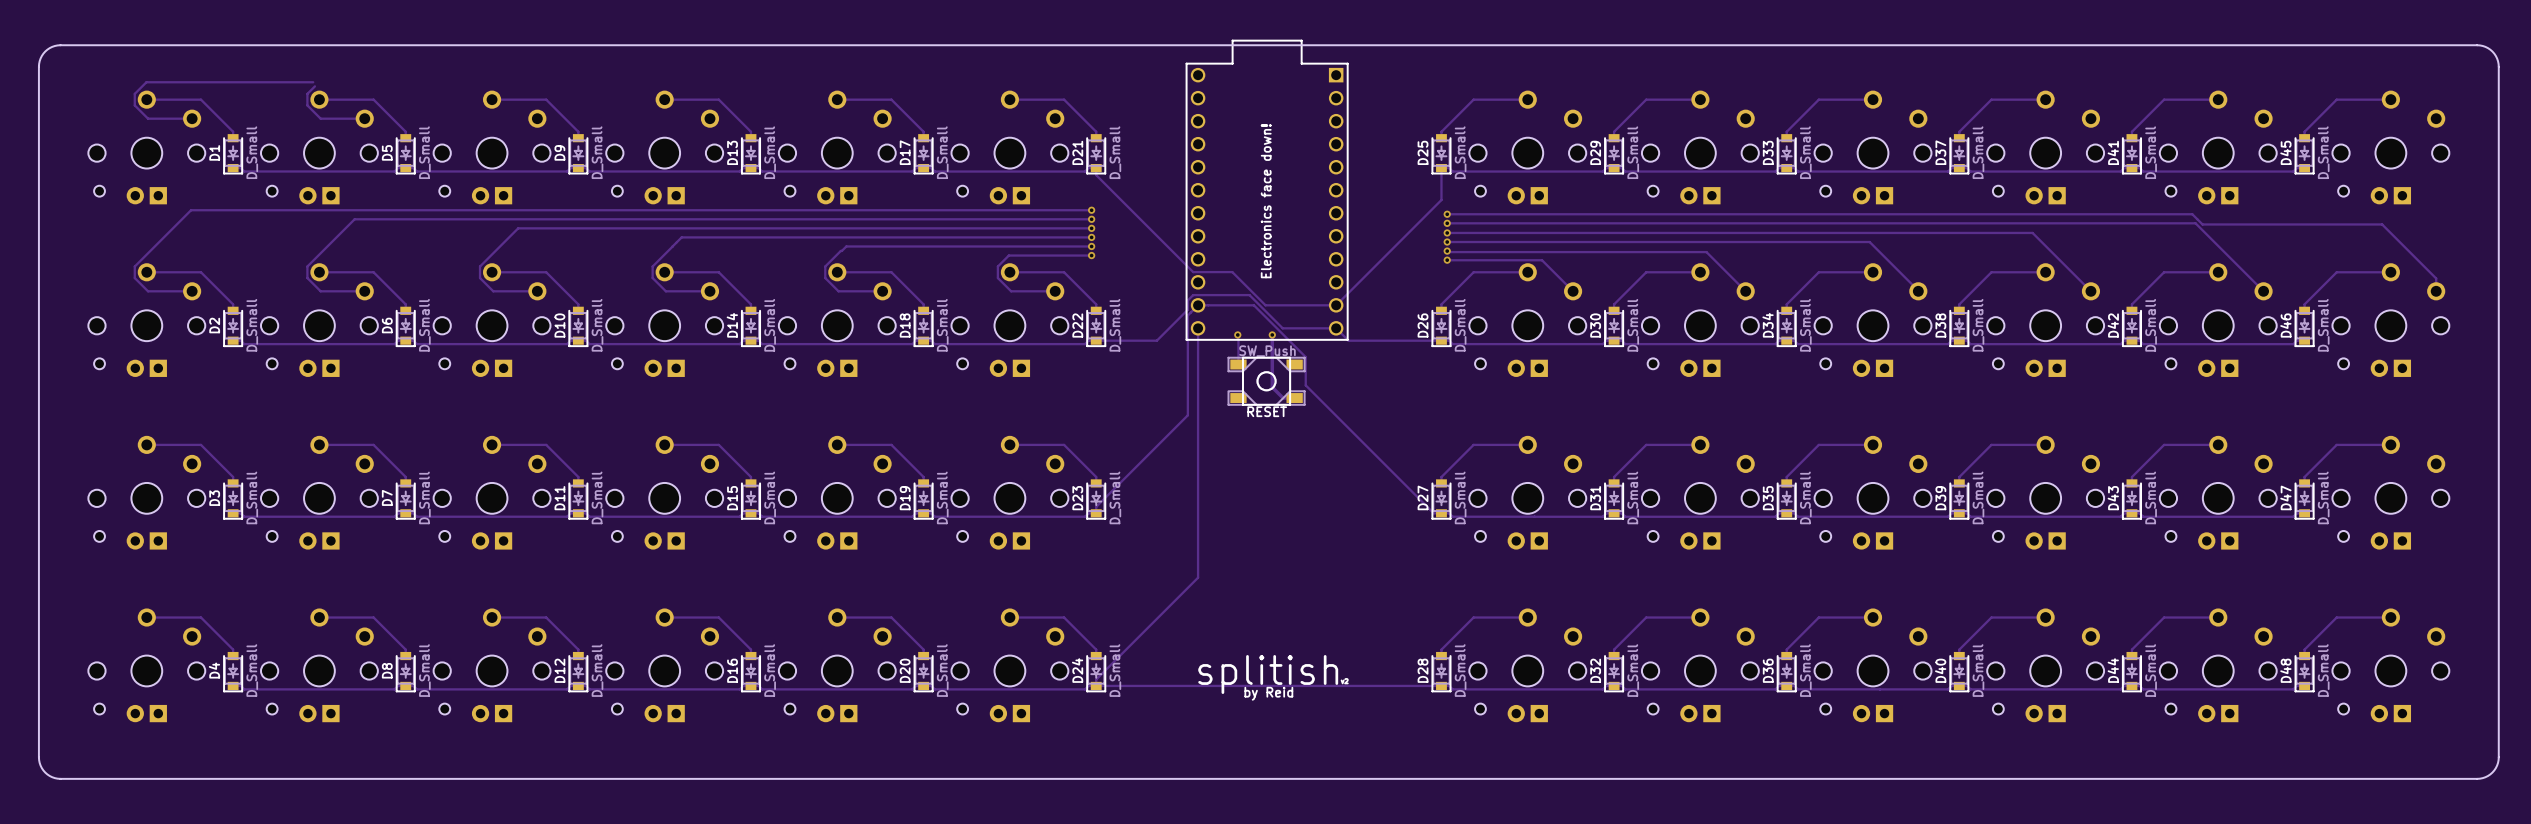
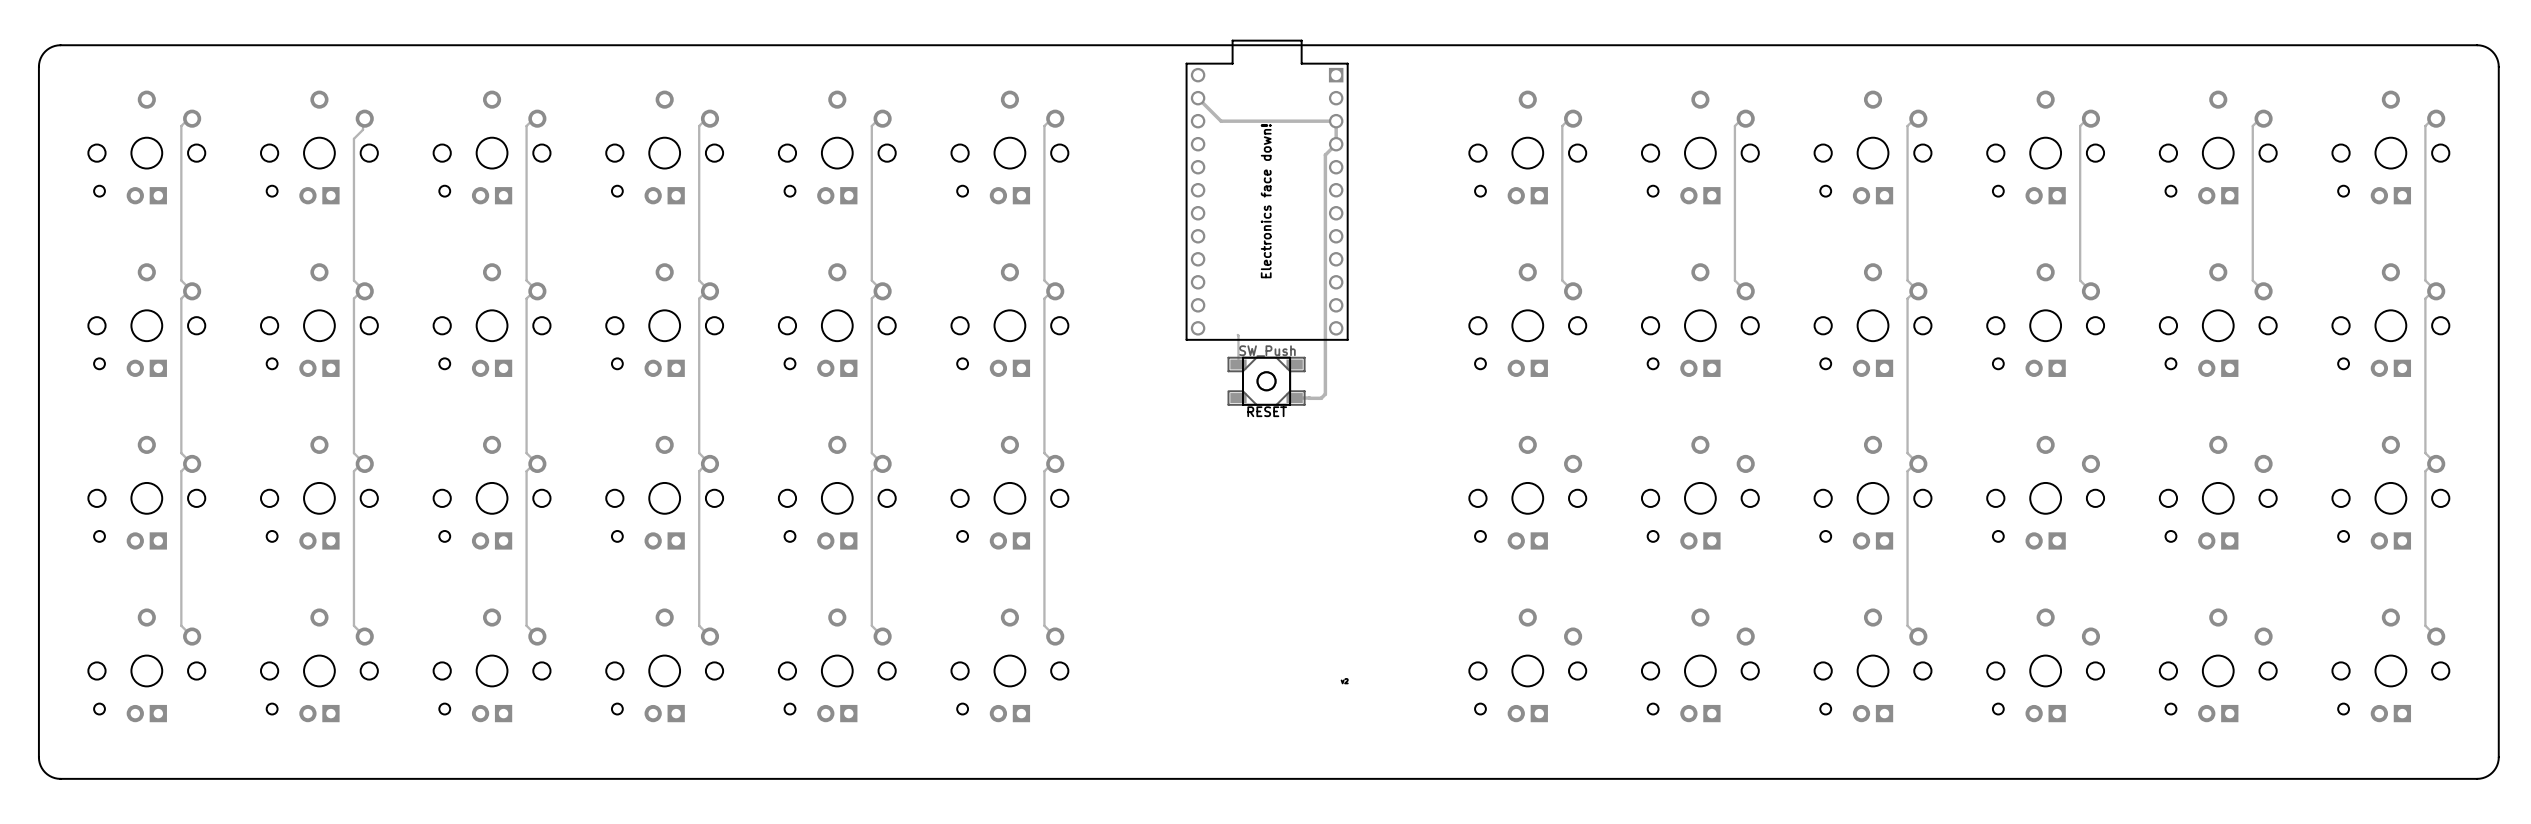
track: (313, 82) (146, 82) (134, 93) (134, 105) (148, 118) (192, 118) -> none
track: (314, 86) (307, 93) (307, 105) (320, 118) (364, 118) -> none
track: (146, 99) (200, 99) (233, 131) (233, 138) -> none
track: (319, 99) (373, 99) (405, 131) (405, 138) -> none
track: (492, 99) (546, 99) (578, 131) (578, 138) -> none
track: (664, 99) (718, 99) (750, 131) (750, 138) -> none
track: (837, 99) (891, 99) (923, 131) (923, 138) -> none
track: (1009, 99) (1064, 99) (1096, 131) (1096, 138) -> none
track: (1527, 99) (1473, 99) (1441, 131) (1441, 138) -> none
track: (1700, 99) (1646, 99) (1614, 131) (1614, 138) -> none
track: (1873, 99) (1818, 99) (1786, 131) (1786, 138) -> none
track: (2045, 99) (1991, 99) (1959, 131) (1959, 138) -> none
track: (2218, 99) (2164, 99) (2131, 131) (2131, 138) -> none
track: (2390, 99) (2336, 99) (2304, 131) (2304, 138) -> none
track: none -> (190, 116) (181, 126) (181, 280) (190, 289) (181, 298) (181, 453) (190, 462) (181, 471) (181, 625) (190, 634)
track: none -> (363, 116) (363, 129) (353, 138) (353, 280) (363, 289) (353, 298) (353, 453) (363, 462) (353, 471) (353, 625) (363, 634)
track: none -> (535, 116) (526, 126) (526, 280) (535, 289) (526, 298) (526, 453) (535, 462) (526, 471) (526, 625) (535, 634)
track: none -> (708, 116) (699, 126) (699, 280) (708, 289) (699, 298) (699, 453) (708, 462) (699, 471) (699, 625) (708, 634)
track: none -> (880, 116) (871, 126) (871, 280) (880, 289) (871, 298) (871, 453) (880, 462) (871, 471) (871, 625) (880, 634)
track: none -> (1053, 116) (1044, 126) (1044, 280) (1053, 289) (1044, 298) (1044, 453) (1053, 462) (1044, 471) (1044, 625) (1053, 634)
track: none -> (1916, 116) (1907, 126) (1907, 280) (1916, 289) (1907, 298) (1907, 453) (1916, 462) (1907, 471) (1907, 625) (1916, 634)
track: none -> (2434, 116) (2425, 126) (2425, 280) (2434, 289) (2425, 298) (2425, 453) (2434, 462) (2425, 471) (2425, 625) (2434, 634)
D1: D_Small (233, 154) -> none
D5: D_Small (405, 154) -> none
D9: D_Small (578, 154) -> none
D13: D_Small (750, 154) -> none
D17: D_Small (923, 154) -> none
D21: D_Small (1096, 154) -> none
D25: D_Small (1441, 154) -> none
D29: D_Small (1614, 154) -> none
D33: D_Small (1786, 154) -> none
D37: D_Small (1959, 154) -> none
D41: D_Small (2131, 154) -> none
D45: D_Small (2304, 154) -> none
track: (233, 168) (240, 168) (244, 171) (394, 171) (398, 168) (413, 168) (416, 171) (567, 171) (570, 168) (586, 168) (589, 171) (739, 171) (743, 168) (758, 168) (762, 171) (912, 171) (915, 168) (931, 168) (934, 171) (1085, 171) (1088, 168) (1096, 168) (1096, 175) (1193, 272) (1232, 272) (1265, 305) (1336, 305) (1441, 200) (1441, 168) (1449, 168) (1452, 171) (1602, 171) (1606, 168) (1621, 168) (1625, 171) (1775, 171) (1778, 168) (1794, 168) (1797, 171) (1948, 171) (1951, 168) (1967, 168) (1970, 171) (2120, 171) (2124, 168) (2139, 168) (2143, 171) (2293, 171) (2296, 168) (2304, 168) -> none
track: (1091, 210) (191, 210) (134, 266) (134, 278) (148, 291) (192, 291) -> none
via: (1091, 210) -> none
track: (1447, 214) (2192, 214) (2202, 224) (2382, 224) (2436, 278) (2436, 291) -> none
via: (1447, 214) -> none
track: (1091, 219) (354, 219) (307, 266) (307, 278) (320, 291) (364, 291) -> none
via: (1091, 219) -> none
track: (1447, 223) (2195, 223) (2252, 280) -> (2261, 116) (2252, 126) (2252, 280)
via: (1447, 223) -> none
track: (1091, 228) (518, 228) (480, 266) (480, 278) (493, 291) (537, 291) -> none
via: (1091, 228) -> none
track: (1447, 232) (2032, 232) (2080, 280) -> (2089, 116) (2080, 126) (2080, 280)
via: (1447, 232) -> none
track: (1091, 237) (681, 237) (672, 246) -> none
via: (1091, 237) -> none
track: (1447, 242) (1869, 242) (1918, 291) -> none
via: (1447, 242) -> none
track: (672, 246) (652, 266) (652, 278) (665, 291) (709, 291) -> none
track: (1091, 246) (846, 246) (825, 266) (825, 278) (838, 291) (882, 291) -> none
via: (1091, 246) -> none
track: (1447, 251) (1706, 252) (1734, 280) -> (1743, 116) (1734, 126) (1734, 280)
via: (1447, 251) -> none
track: (1091, 255) (1008, 255) (997, 266) (997, 278) (1011, 291) (1055, 291) -> none
via: (1091, 255) -> none
track: (1447, 260) (1542, 260) (1562, 280) -> (1571, 116) (1562, 126) (1562, 280)
via: (1447, 260) -> none
track: (146, 272) (200, 272) (233, 304) (233, 310) -> none
track: (319, 272) (373, 272) (405, 304) (405, 310) -> none
track: (492, 272) (546, 272) (578, 304) (578, 310) -> none
track: (664, 272) (718, 272) (750, 304) (750, 310) -> none
track: (837, 272) (891, 272) (923, 304) (923, 310) -> none
track: (1009, 272) (1064, 272) (1096, 304) (1096, 310) -> none
track: (1527, 272) (1473, 272) (1441, 304) (1441, 310) -> none
track: (1700, 272) (1646, 272) (1614, 304) (1614, 310) -> none
track: (1873, 272) (1818, 272) (1786, 304) (1786, 310) -> none
track: (2045, 272) (1991, 272) (1959, 304) (1959, 310) -> none
track: (2218, 272) (2164, 272) (2131, 304) (2131, 310) -> none
track: (2390, 272) (2336, 272) (2304, 304) (2304, 310) -> none
D2: D_Small (233, 326) -> none
D6: D_Small (405, 326) -> none
D10: D_Small (578, 326) -> none
D14: D_Small (750, 326) -> none
D18: D_Small (923, 326) -> none
D22: D_Small (1096, 326) -> none
D26: D_Small (1441, 326) -> none
D30: D_Small (1614, 326) -> none
D34: D_Small (1786, 326) -> none
D38: D_Small (1959, 326) -> none
D42: D_Small (2131, 326) -> none
D46: D_Small (2304, 326) -> none
track: (1198, 328) (1198, 577) (1096, 679) (1096, 685) -> none
via: (1237, 334) -> none
track: (1272, 334) (1272, 387) (1283, 398) (1294, 398) -> (1198, 98) (1221, 121) (1336, 121) (1336, 144) (1325, 154) (1325, 394) (1321, 398) (1294, 398)
via: (1272, 334) -> none
track: (233, 340) (240, 340) (244, 344) (394, 344) (398, 340) (413, 340) (416, 344) (567, 344) (570, 340) (586, 340) (589, 344) (739, 344) (743, 340) (758, 340) (762, 344) (912, 344) (915, 340) (931, 340) (934, 344) (1085, 344) (1088, 340) (1156, 340) (1187, 309) (1187, 300) (1193, 295) (1249, 295) (1282, 328) (1336, 328) (1348, 340) (1449, 340) (1452, 344) (1602, 344) (1606, 340) (1621, 340) (1625, 344) (1775, 344) (1778, 340) (1794, 340) (1797, 344) (1948, 344) (1951, 340) (1967, 340) (1970, 344) (2120, 344) (2124, 340) (2139, 340) (2143, 344) (2293, 344) (2296, 340) (2304, 340) -> none
track: (146, 444) (200, 444) (233, 477) (233, 483) -> none
track: (319, 444) (373, 444) (405, 477) (405, 483) -> none
track: (492, 444) (546, 444) (578, 477) (578, 483) -> none
track: (664, 444) (718, 444) (750, 477) (750, 483) -> none
track: (837, 444) (891, 444) (923, 477) (923, 483) -> none
track: (1009, 444) (1064, 444) (1096, 477) (1096, 483) -> none
track: (1527, 444) (1473, 444) (1441, 477) (1441, 483) -> none
track: (1700, 444) (1646, 444) (1614, 477) (1614, 483) -> none
track: (1873, 444) (1818, 444) (1786, 477) (1786, 483) -> none
track: (2045, 444) (1991, 444) (1959, 477) (1959, 483) -> none
track: (2218, 444) (2164, 444) (2131, 477) (2131, 483) -> none
track: (2390, 444) (2336, 444) (2304, 477) (2304, 483) -> none
D3: D_Small (233, 499) -> none
D7: D_Small (405, 499) -> none
D11: D_Small (578, 499) -> none
D15: D_Small (750, 499) -> none
D19: D_Small (923, 499) -> none
D23: D_Small (1096, 499) -> none
D27: D_Small (1441, 499) -> none
D31: D_Small (1614, 499) -> none
D35: D_Small (1786, 499) -> none
D39: D_Small (1959, 499) -> none
D43: D_Small (2131, 499) -> none
D47: D_Small (2304, 499) -> none
track: (233, 513) (240, 513) (244, 516) (394, 516) (398, 513) (413, 513) (416, 516) (567, 516) (570, 513) (586, 513) (589, 516) (739, 516) (743, 513) (758, 513) (762, 516) (912, 516) (915, 513) (931, 513) (934, 516) (1085, 516) (1088, 513) (1096, 513) (1096, 506) (1187, 415) (1187, 315) (1198, 305) (1253, 305) (1305, 357) (1305, 385) (1433, 513) (1449, 513) (1452, 516) (1602, 516) (1606, 513) (1621, 513) (1625, 516) (1775, 516) (1778, 513) (1794, 513) (1797, 516) (1948, 516) (1951, 513) (1967, 513) (1970, 516) (2120, 516) (2124, 513) (2139, 513) (2143, 516) (2293, 516) (2296, 513) (2304, 513) -> none
track: (146, 617) (200, 617) (233, 649) (233, 656) -> none
track: (319, 617) (373, 617) (405, 649) (405, 656) -> none
track: (492, 617) (546, 617) (578, 649) (578, 656) -> none
track: (664, 617) (718, 617) (750, 649) (750, 656) -> none
track: (837, 617) (891, 617) (923, 649) (923, 656) -> none
track: (1009, 617) (1064, 617) (1096, 649) (1096, 656) -> none
track: (1527, 617) (1473, 617) (1441, 649) (1441, 656) -> none
track: (1700, 617) (1646, 617) (1614, 649) (1614, 656) -> none
track: (1873, 617) (1818, 617) (1786, 649) (1786, 656) -> none
track: (2045, 617) (1991, 617) (1959, 649) (1959, 656) -> none
track: (2218, 617) (2164, 617) (2131, 649) (2131, 656) -> none
track: (2390, 617) (2336, 617) (2304, 649) (2304, 656) -> none
D4: D_Small (233, 671) -> none
D8: D_Small (405, 671) -> none
D12: D_Small (578, 671) -> none
D16: D_Small (750, 671) -> none
D20: D_Small (923, 671) -> none
D24: D_Small (1096, 671) -> none
D28: D_Small (1441, 671) -> none
D32: D_Small (1614, 671) -> none
D36: D_Small (1786, 671) -> none
D40: D_Small (1959, 671) -> none
D44: D_Small (2131, 671) -> none
D48: D_Small (2304, 671) -> none
text: splitish (1268, 674) -> none
track: (233, 685) (240, 685) (244, 689) (394, 689) (398, 685) (413, 685) (416, 689) (567, 689) (570, 685) (586, 685) (589, 689) (739, 689) (743, 685) (758, 685) (762, 689) (912, 689) (915, 685) (931, 685) (934, 689) (1085, 689) (1088, 685) (1449, 685) (1452, 689) (1602, 689) (1606, 685) (1621, 685) (1625, 689) (1775, 689) (1778, 685) (1794, 685) (1797, 689) (1948, 689) (1951, 685) (1967, 685) (1970, 689) (2120, 689) (2124, 685) (2139, 685) (2143, 689) (2293, 689) (2296, 685) (2304, 685) -> none
text: by Reid (1268, 693) -> none

